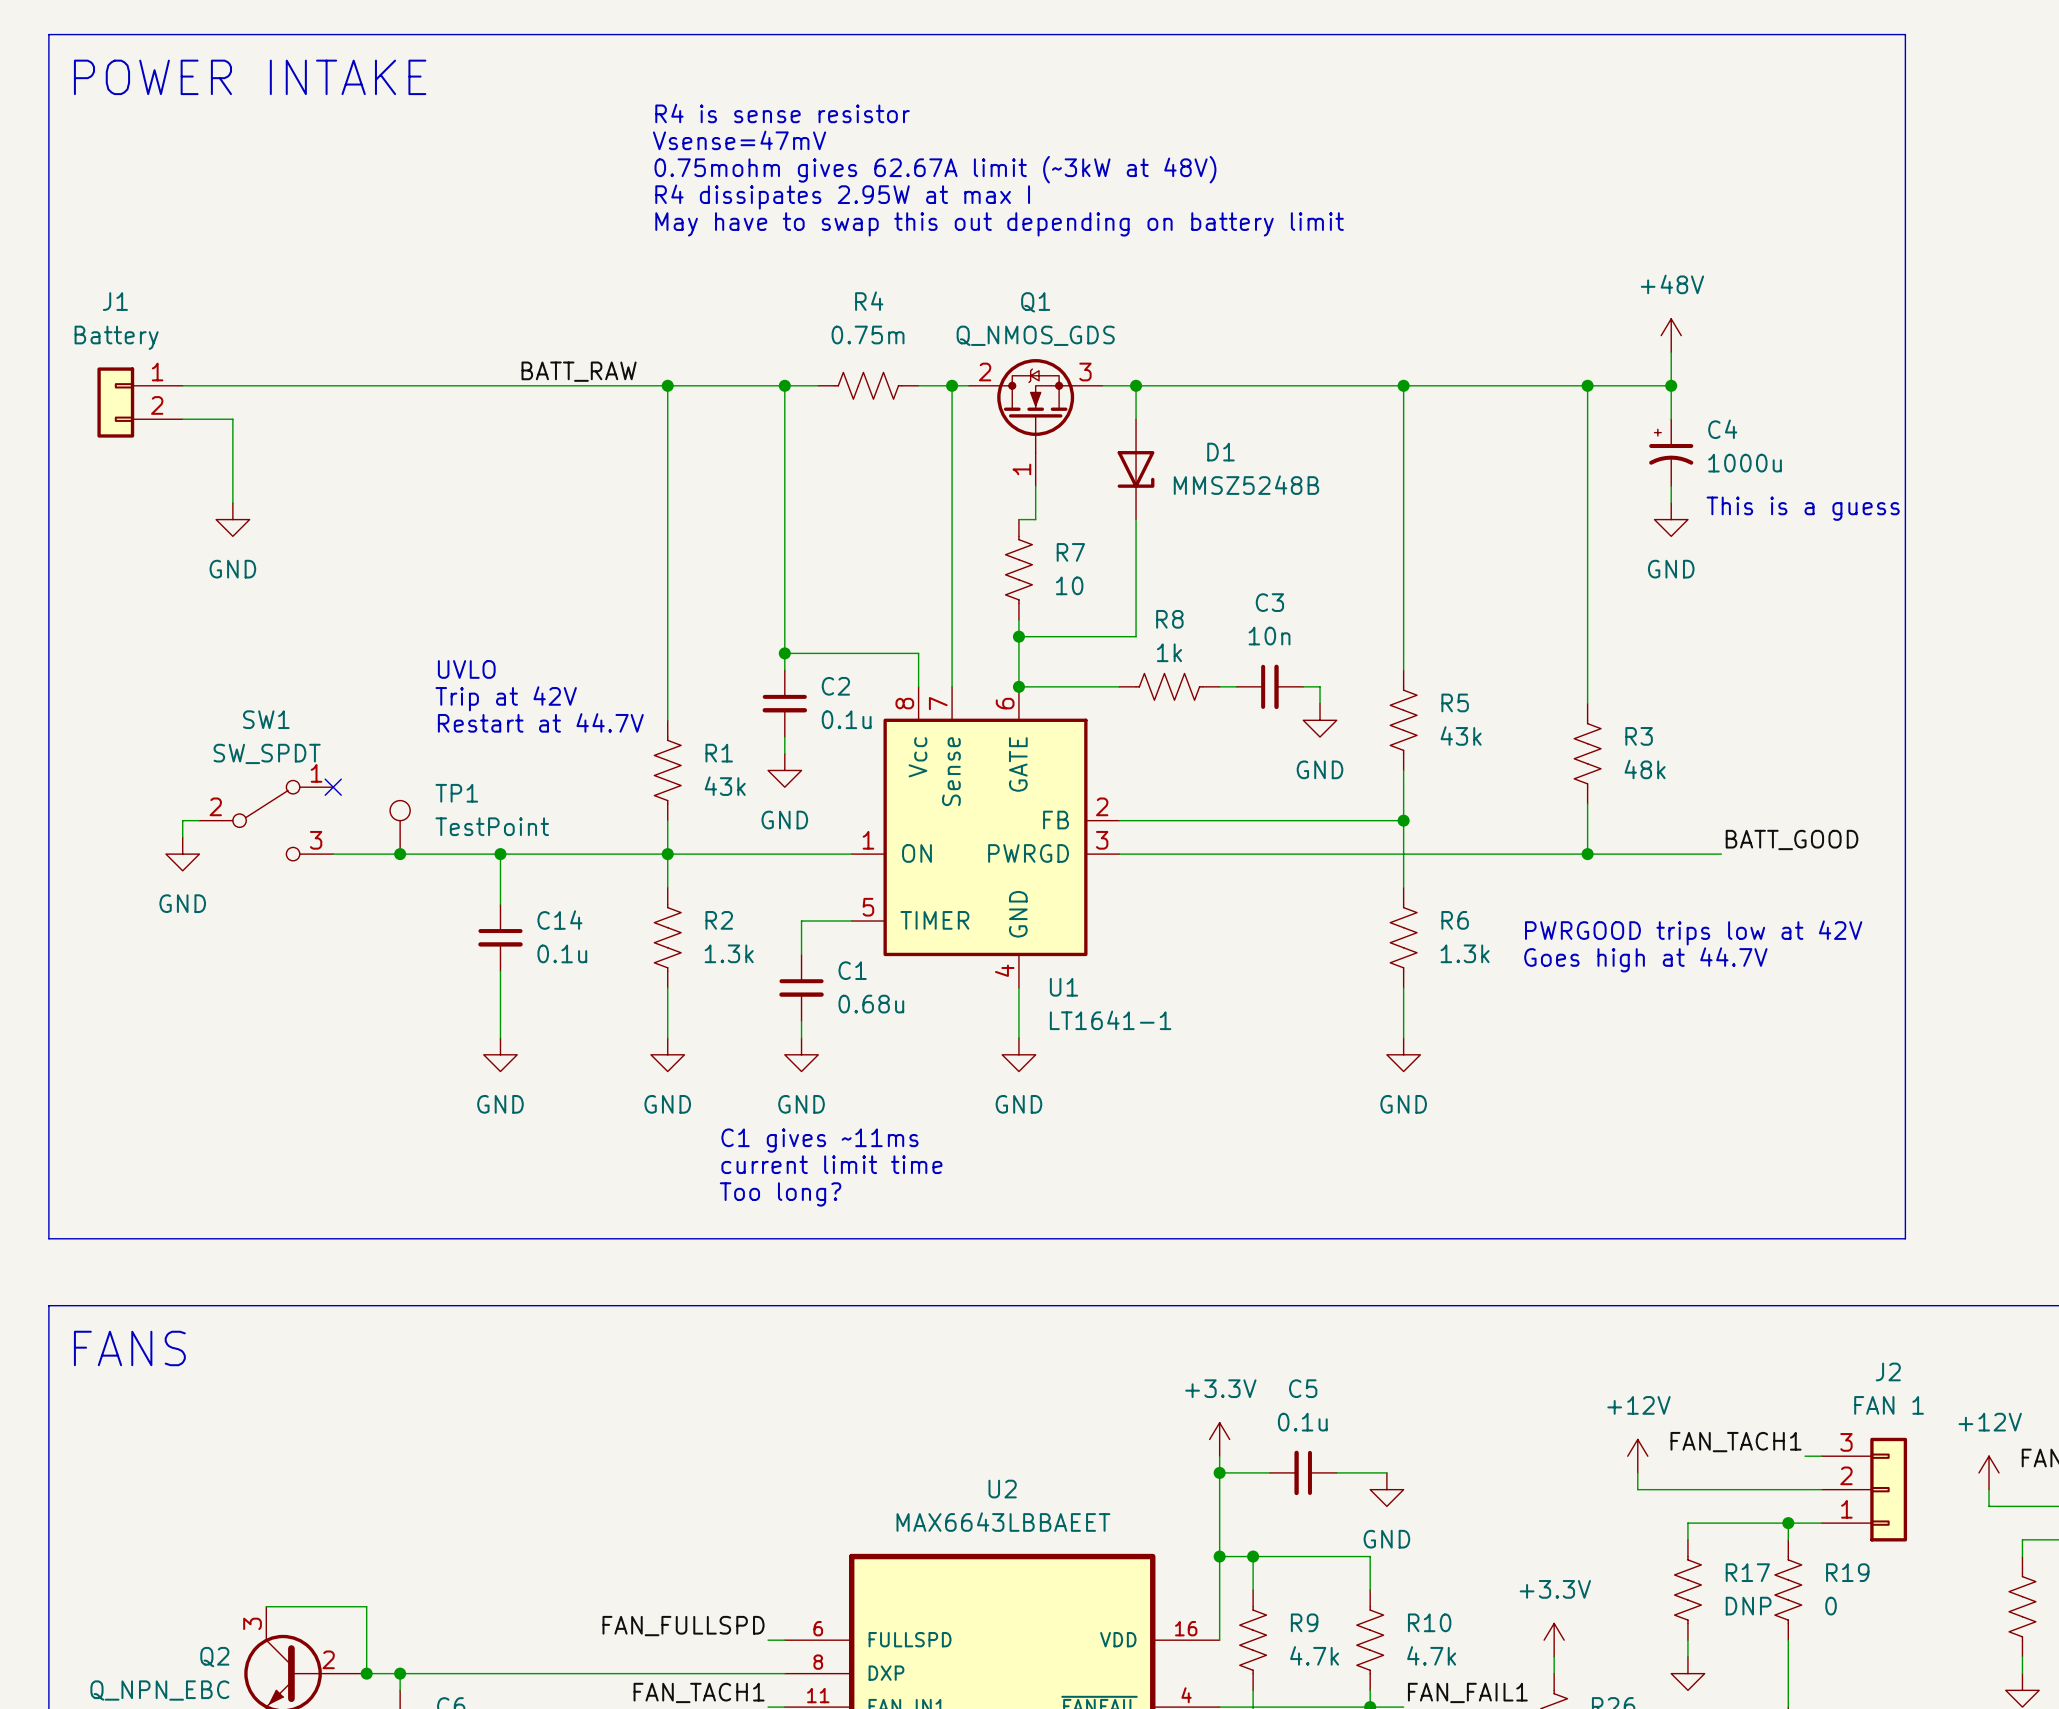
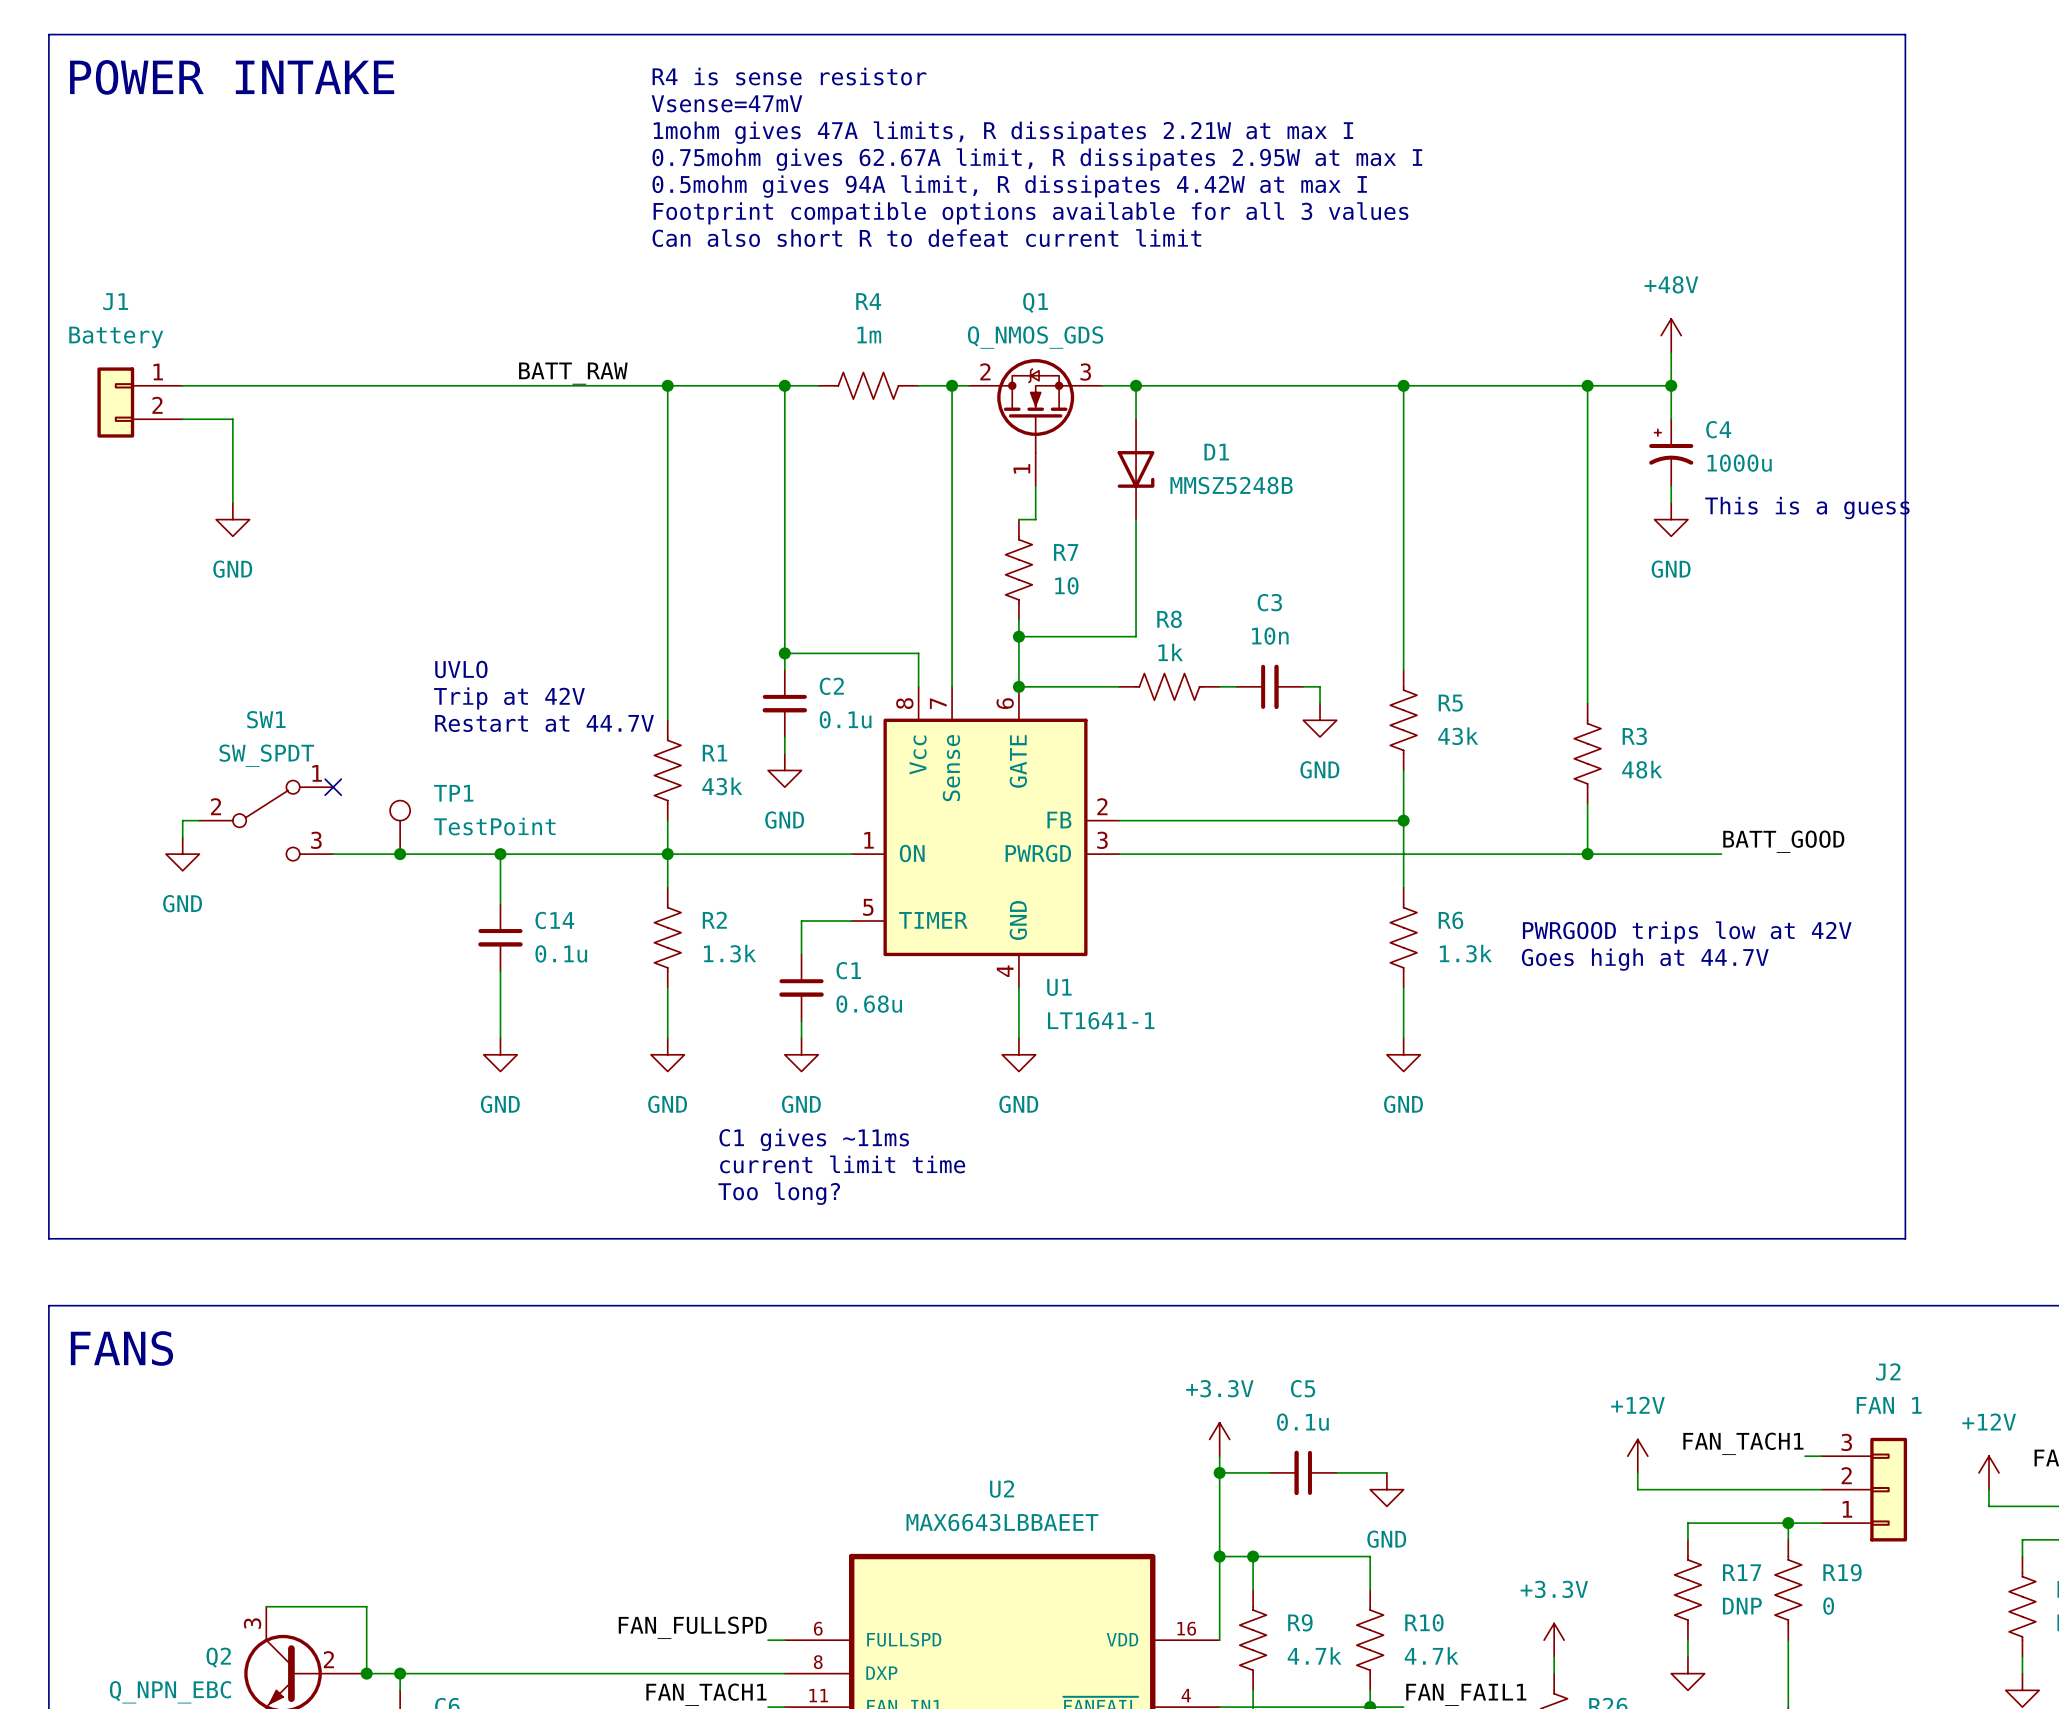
text position: R4 is sense resistor (782, 113) -> R4 is sense resistor (789, 76)
text: none -> 1mohm gives 47A limits, R dissipates 2.21W at max I (1003, 132)
text position: Vsense=47mV (739, 140) -> Vsense=47mV (726, 103)
text: 0.75mohm gives 62.67A limit (~3kW at 48V) (935, 169) -> 0.75mohm gives 62.67A limit, R dissipates 2.95W at max I (1037, 159)
text: none -> 0.5mohm gives 94A limit, R dissipates 4.42W at max I (1009, 186)
text: R4 dissipates 2.95W at max I (842, 197) -> none
text: none -> Footprint compatible options available for all 3 values (1030, 213)
text: May have to swap this out depending on battery limit (999, 224) -> none
text: none -> Can also short R to defeat current limit (926, 238)
R4 value: 0.75m (868, 335) -> 1m (869, 335)

